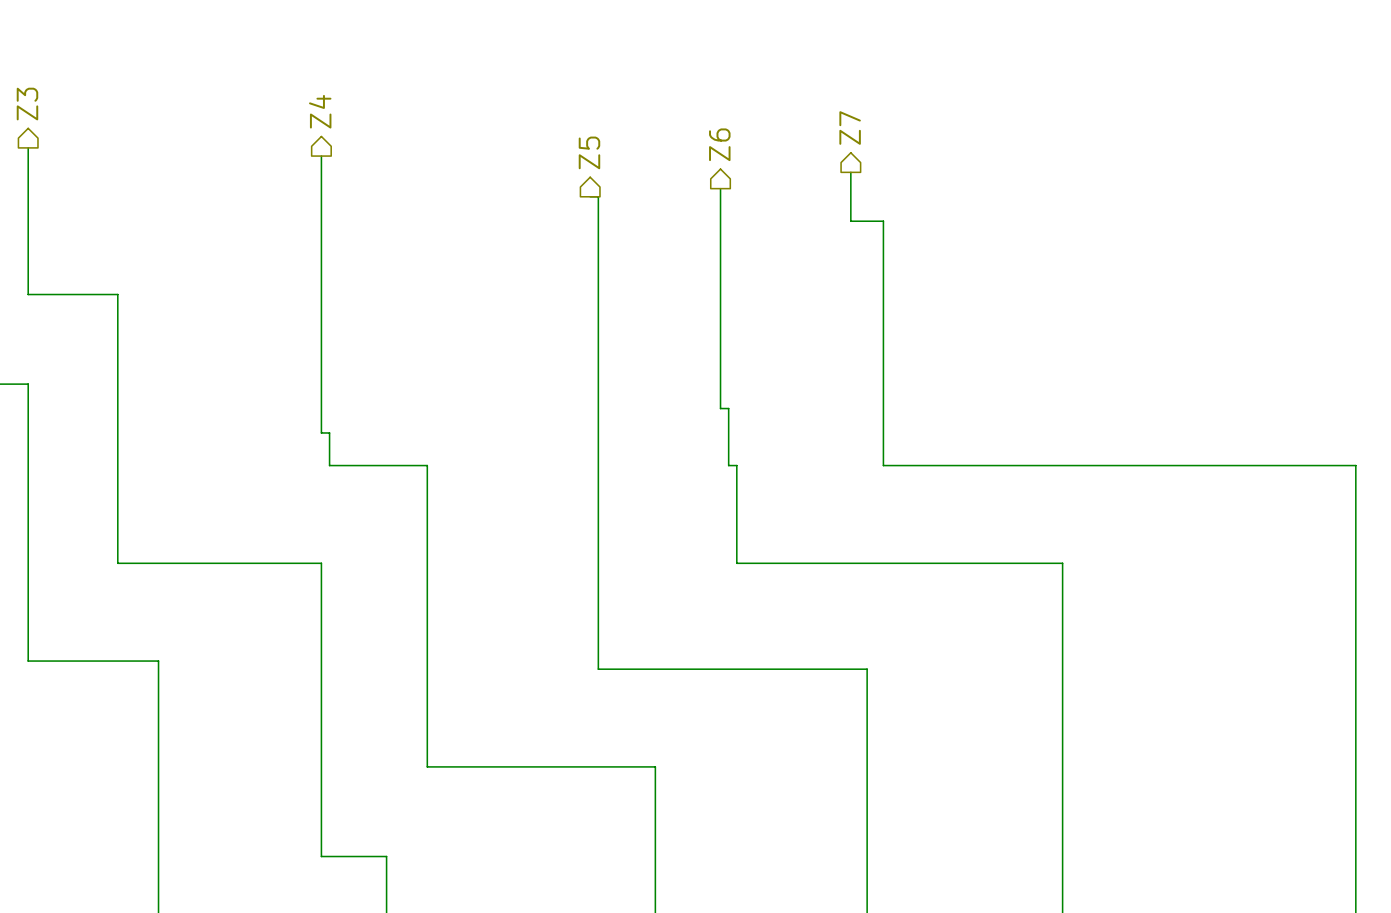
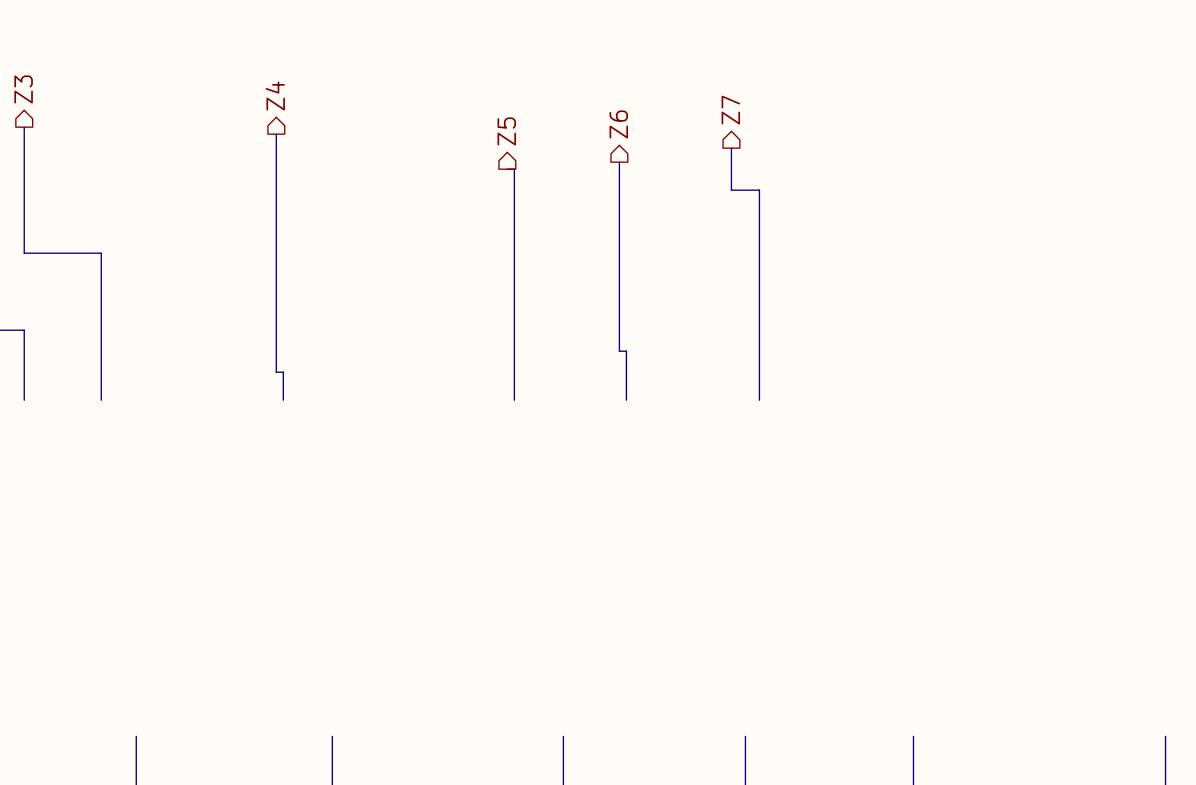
wire: (28, 465) (28, 661) (158, 661) (158, 856) -> none
wire: (117, 465) (117, 563) (321, 563) (321, 856) (386, 856) -> none
wire: (329, 465) (427, 465) (427, 766) (655, 766) (655, 856) -> none
wire: (598, 465) (598, 669) (867, 669) (867, 856) -> none
wire: (728, 465) (736, 465) (736, 563) (1062, 563) (1062, 856) -> none
wire: (883, 465) (1355, 465) (1355, 856) -> none

